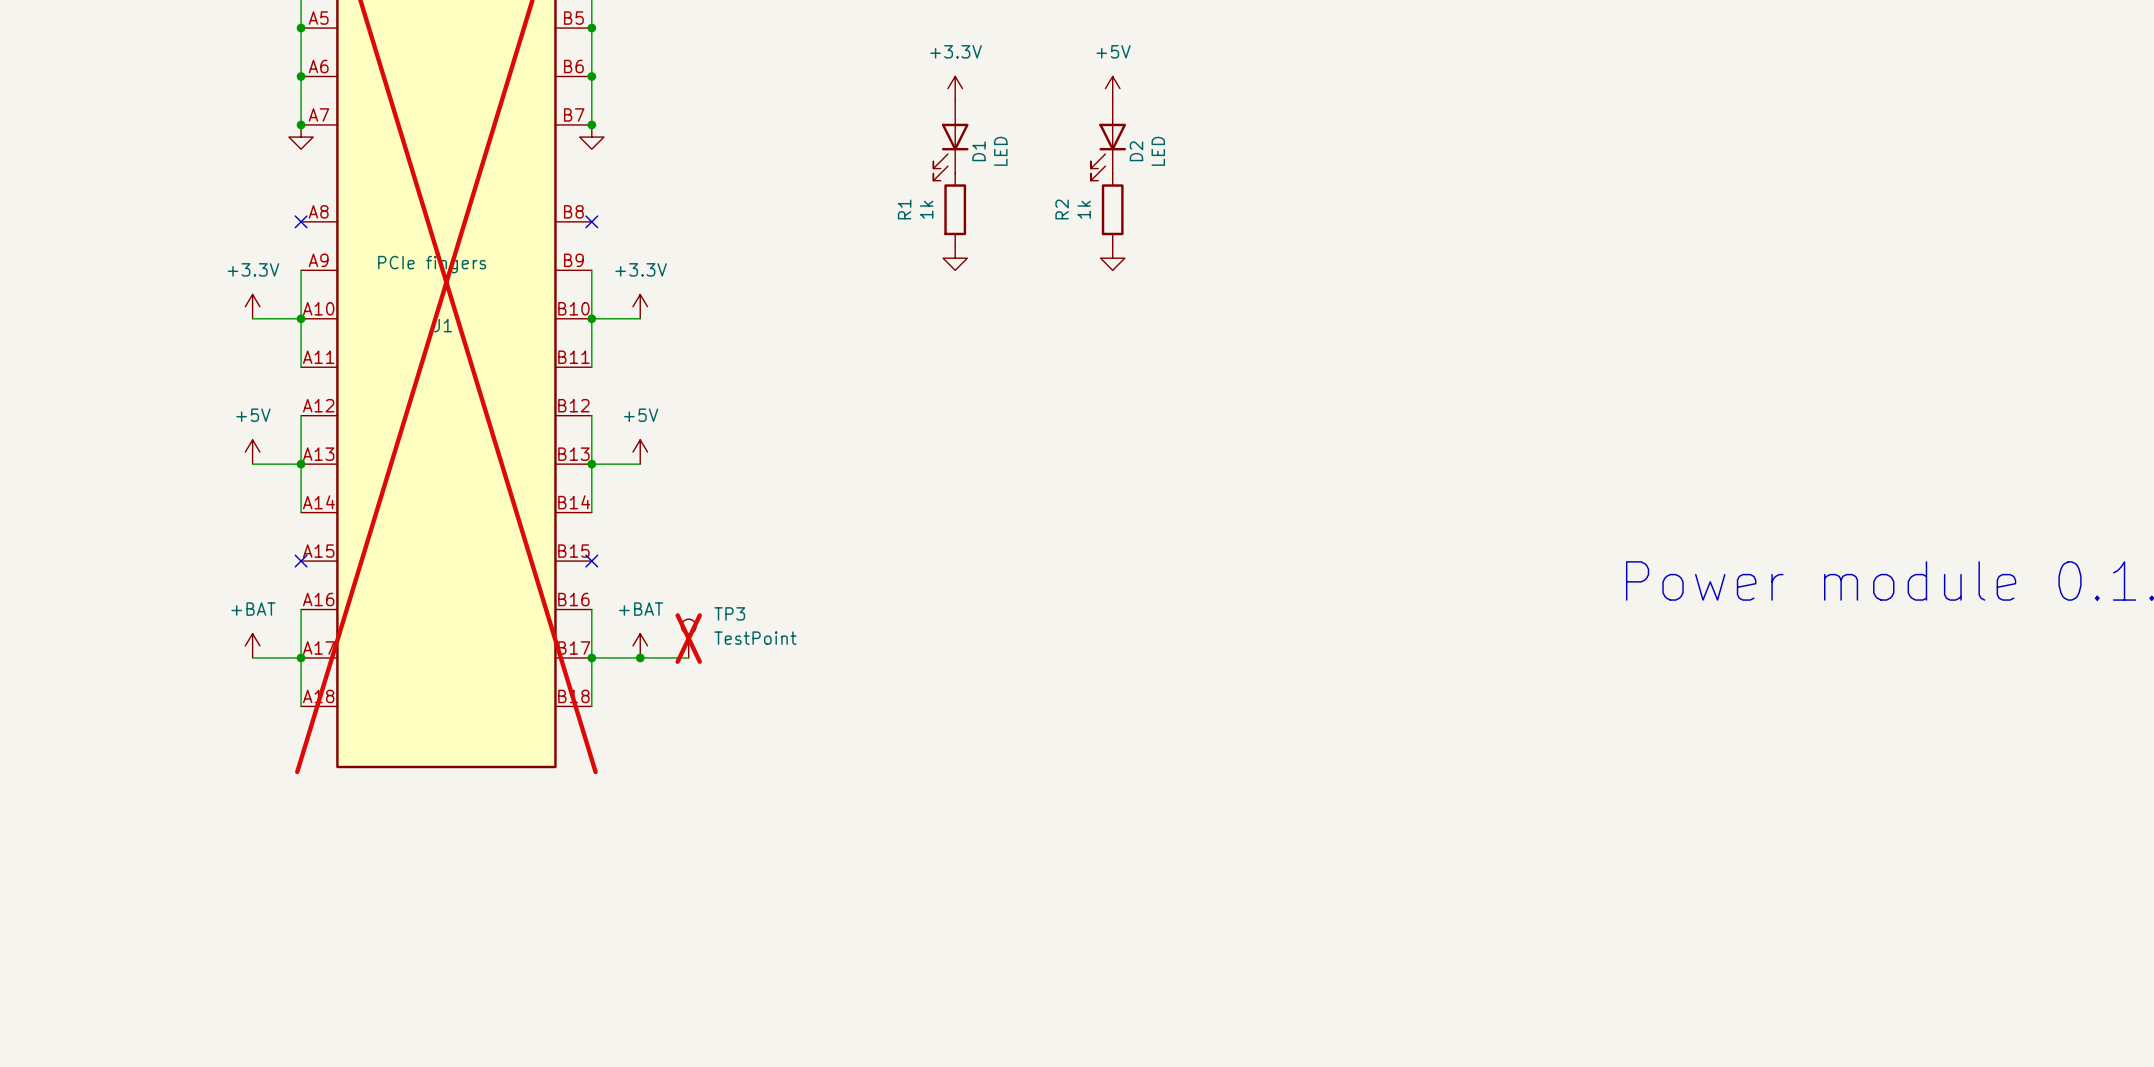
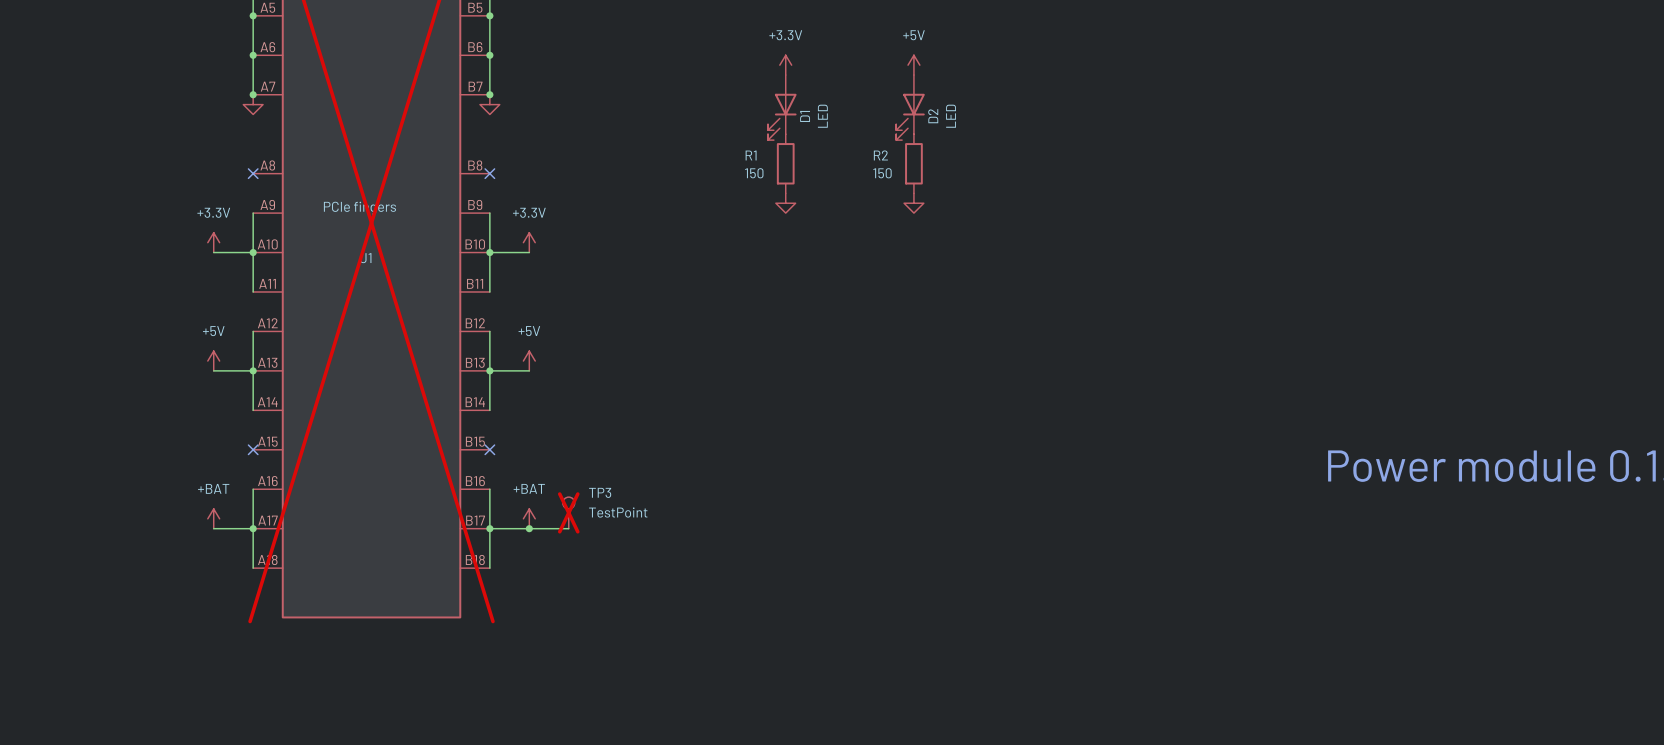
R1 name rotation: 0° (904, 209) -> 90° clockwise (751, 155)
R1 value: 1k (926, 209) -> 150 (754, 173)
R2 name rotation: 0° (1062, 209) -> 90° clockwise (880, 155)
R2 value: 1k (1084, 209) -> 150 (882, 173)

